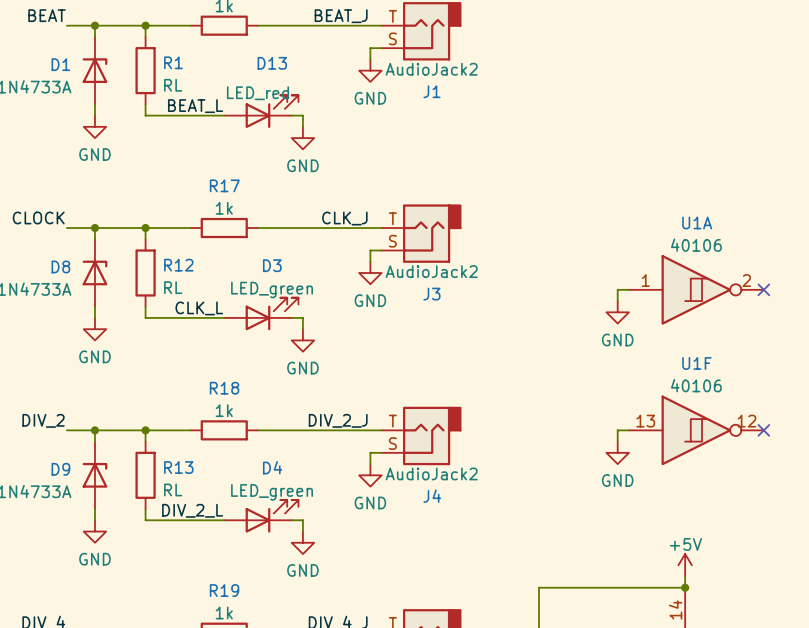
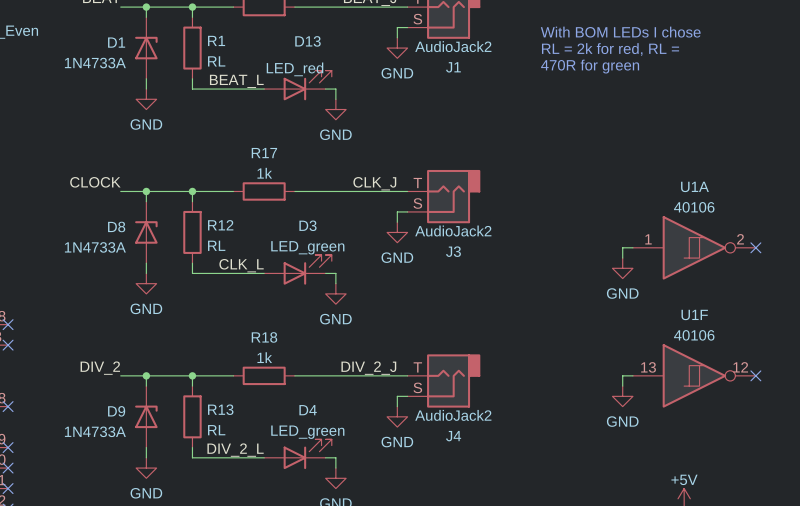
text: none -> With BOM LEDs I chose (620, 32)
text: none -> RL = 2k for red, RL = (610, 49)
text: none -> 470R for green (590, 66)

